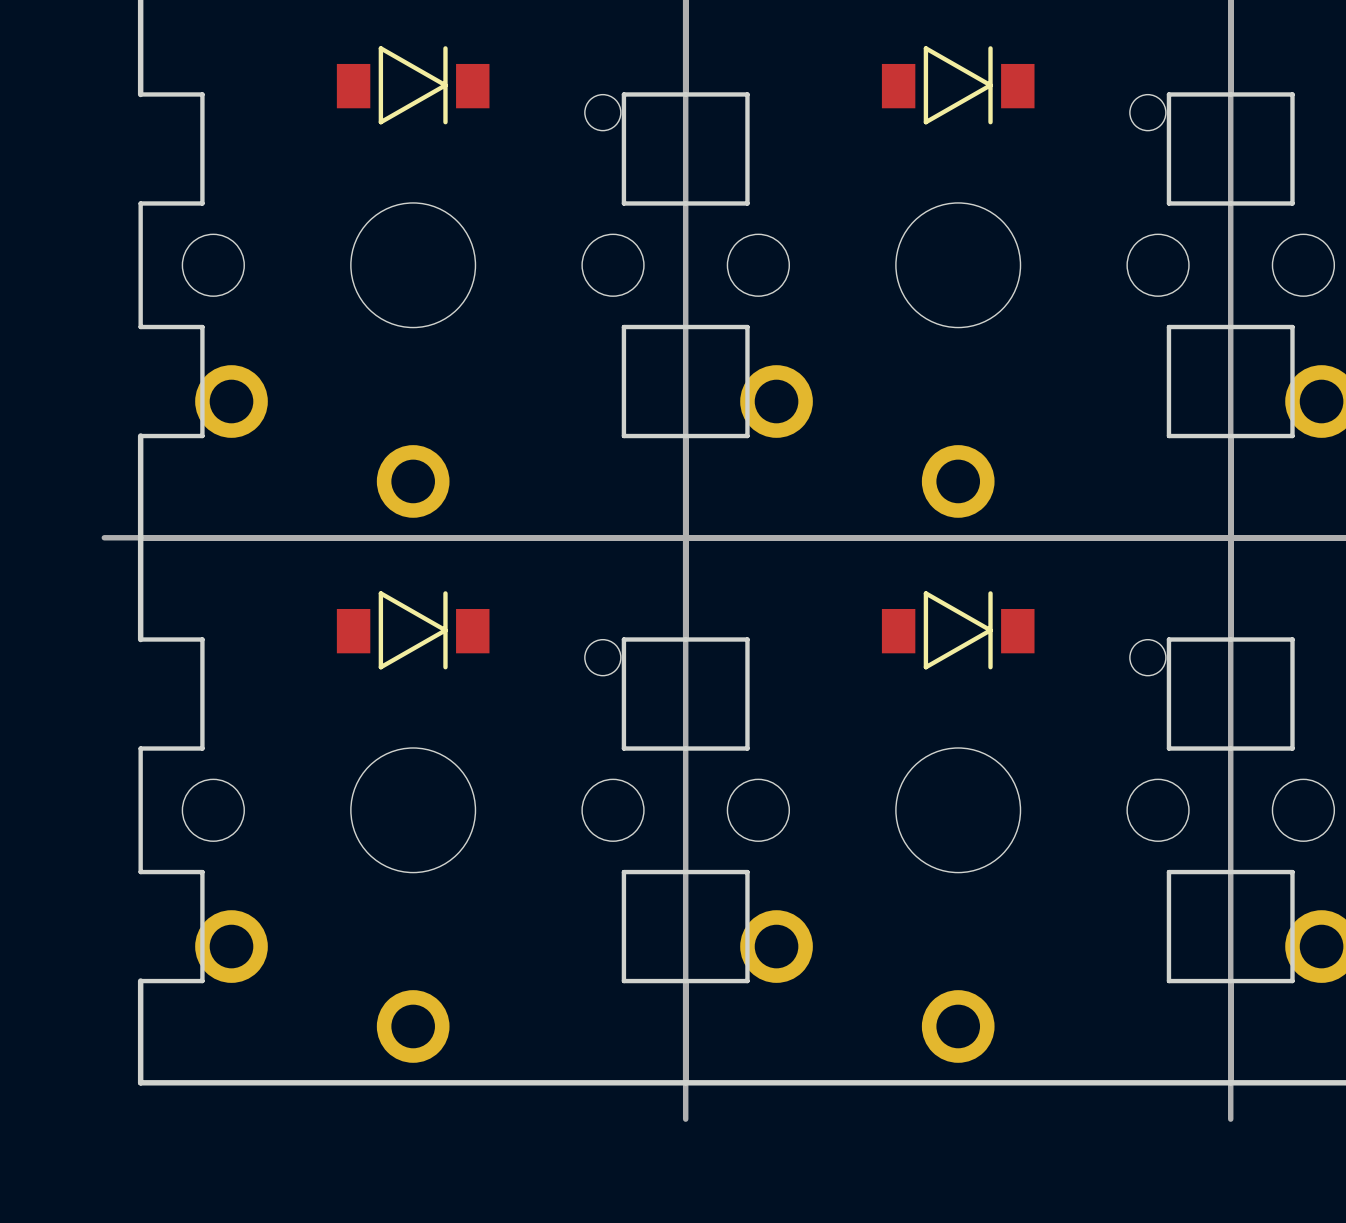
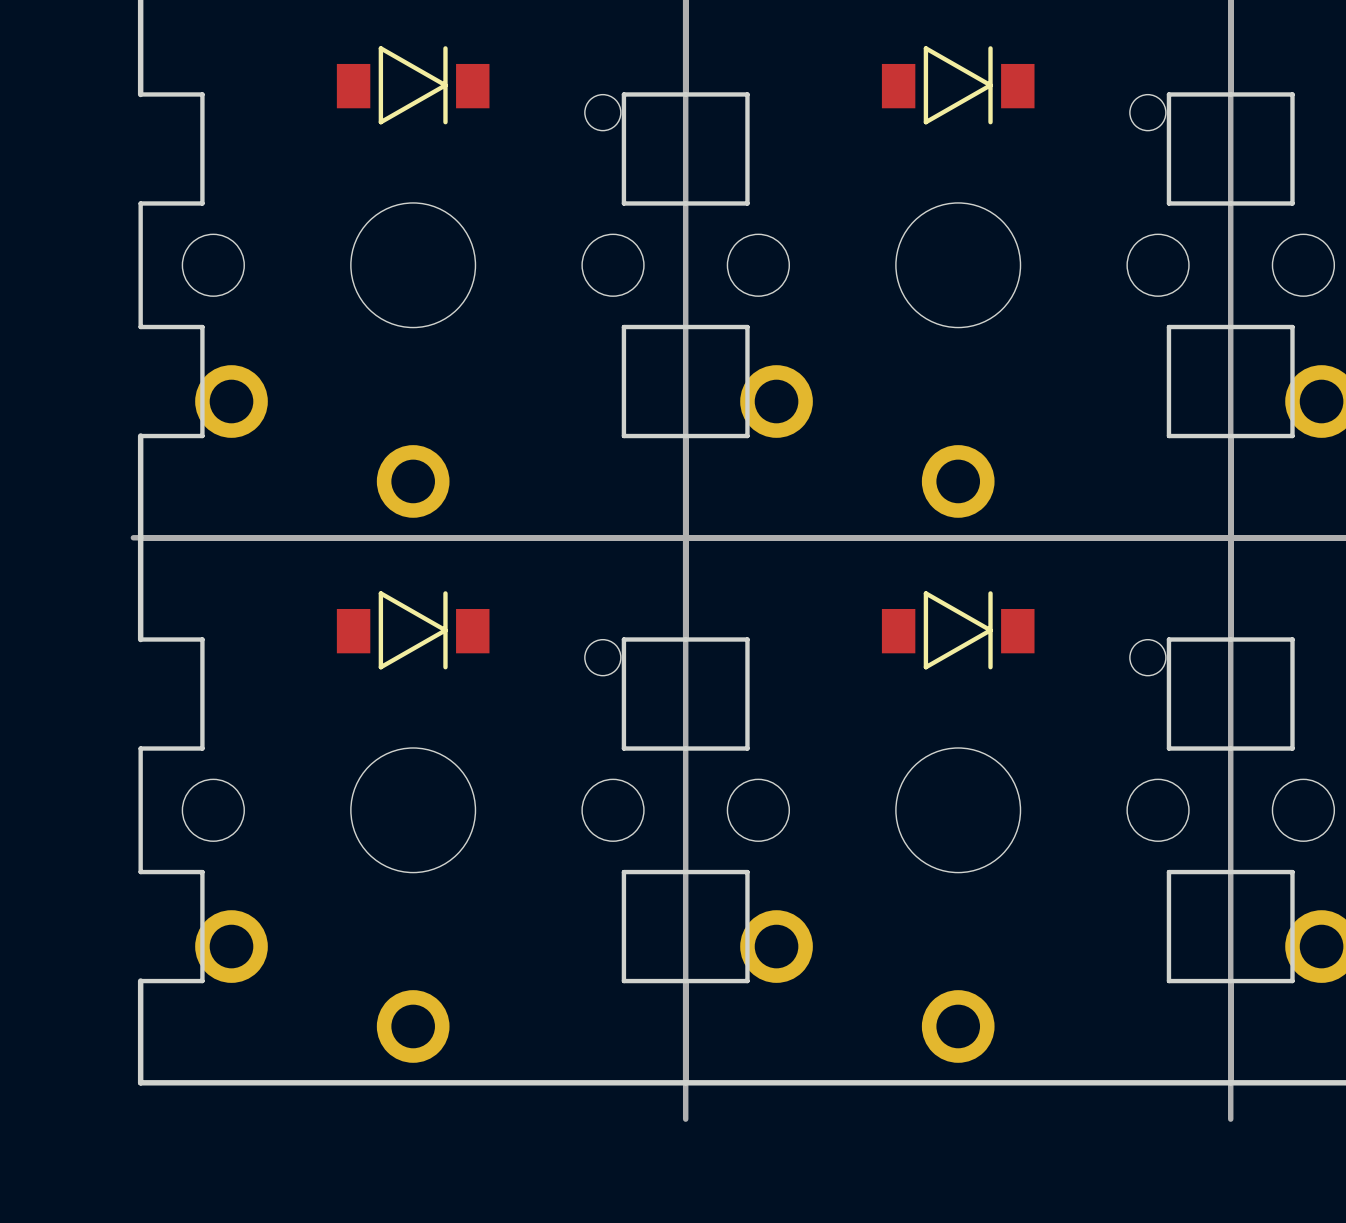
line: (104, 537) (133, 537) -> none

